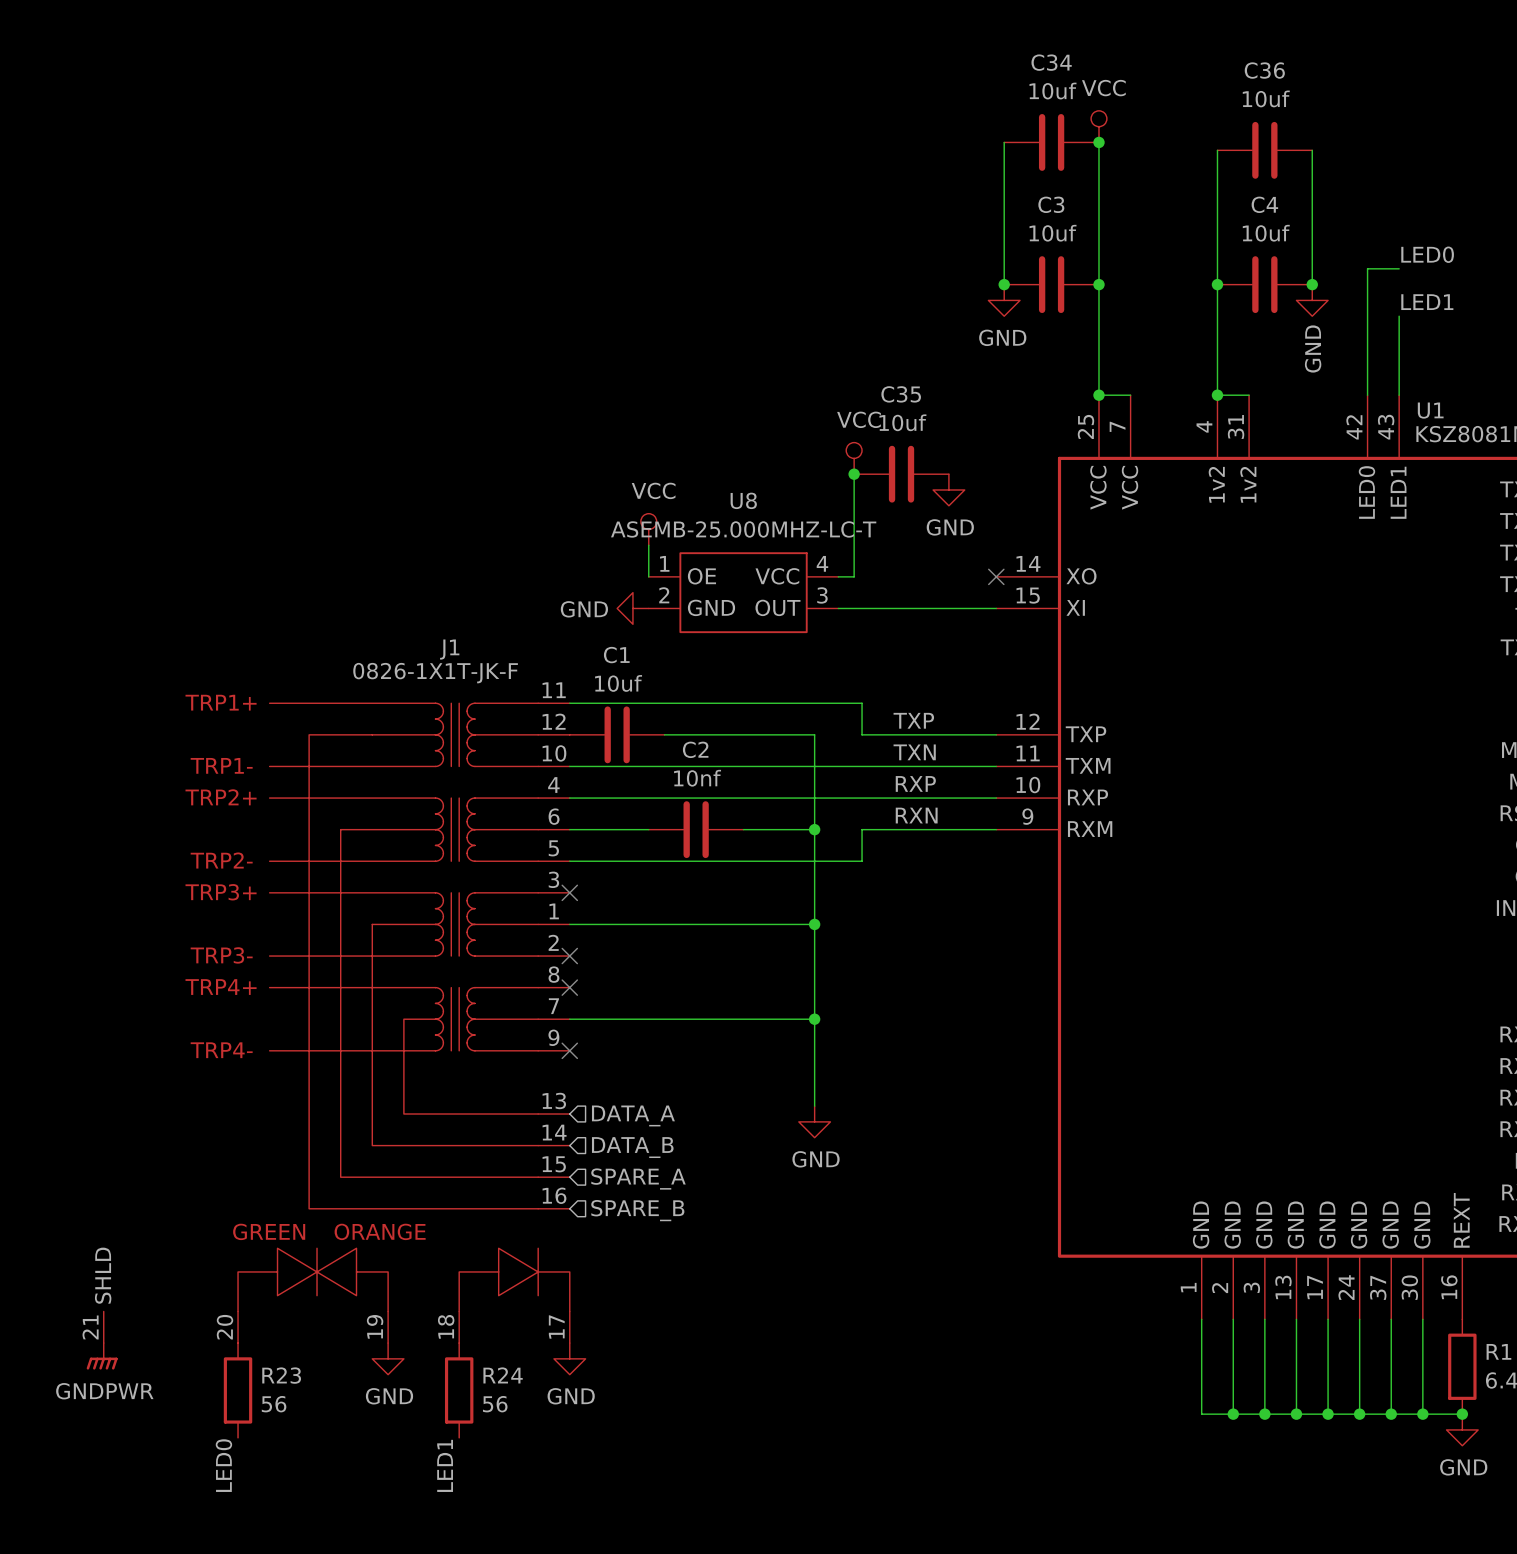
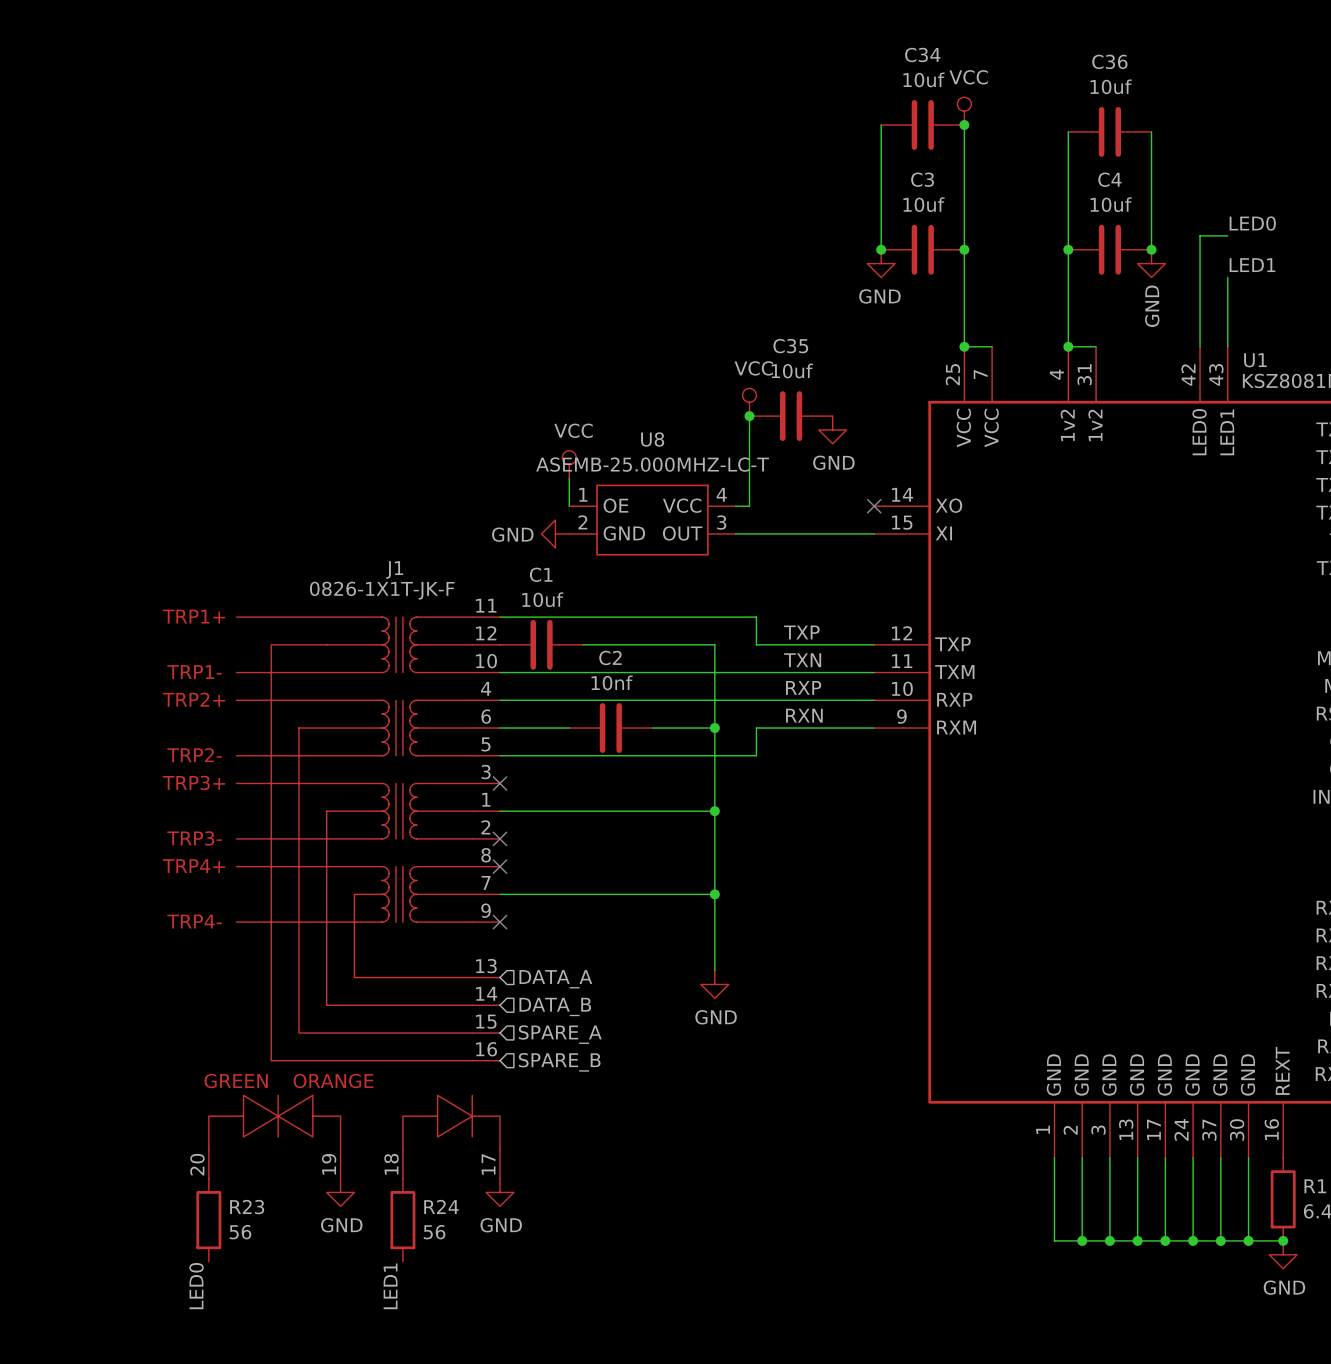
J1 symbol: [103, 703, 570, 1344] -> [208, 617, 500, 1179]
power symbol: GNDPWR (102, 1356) -> none

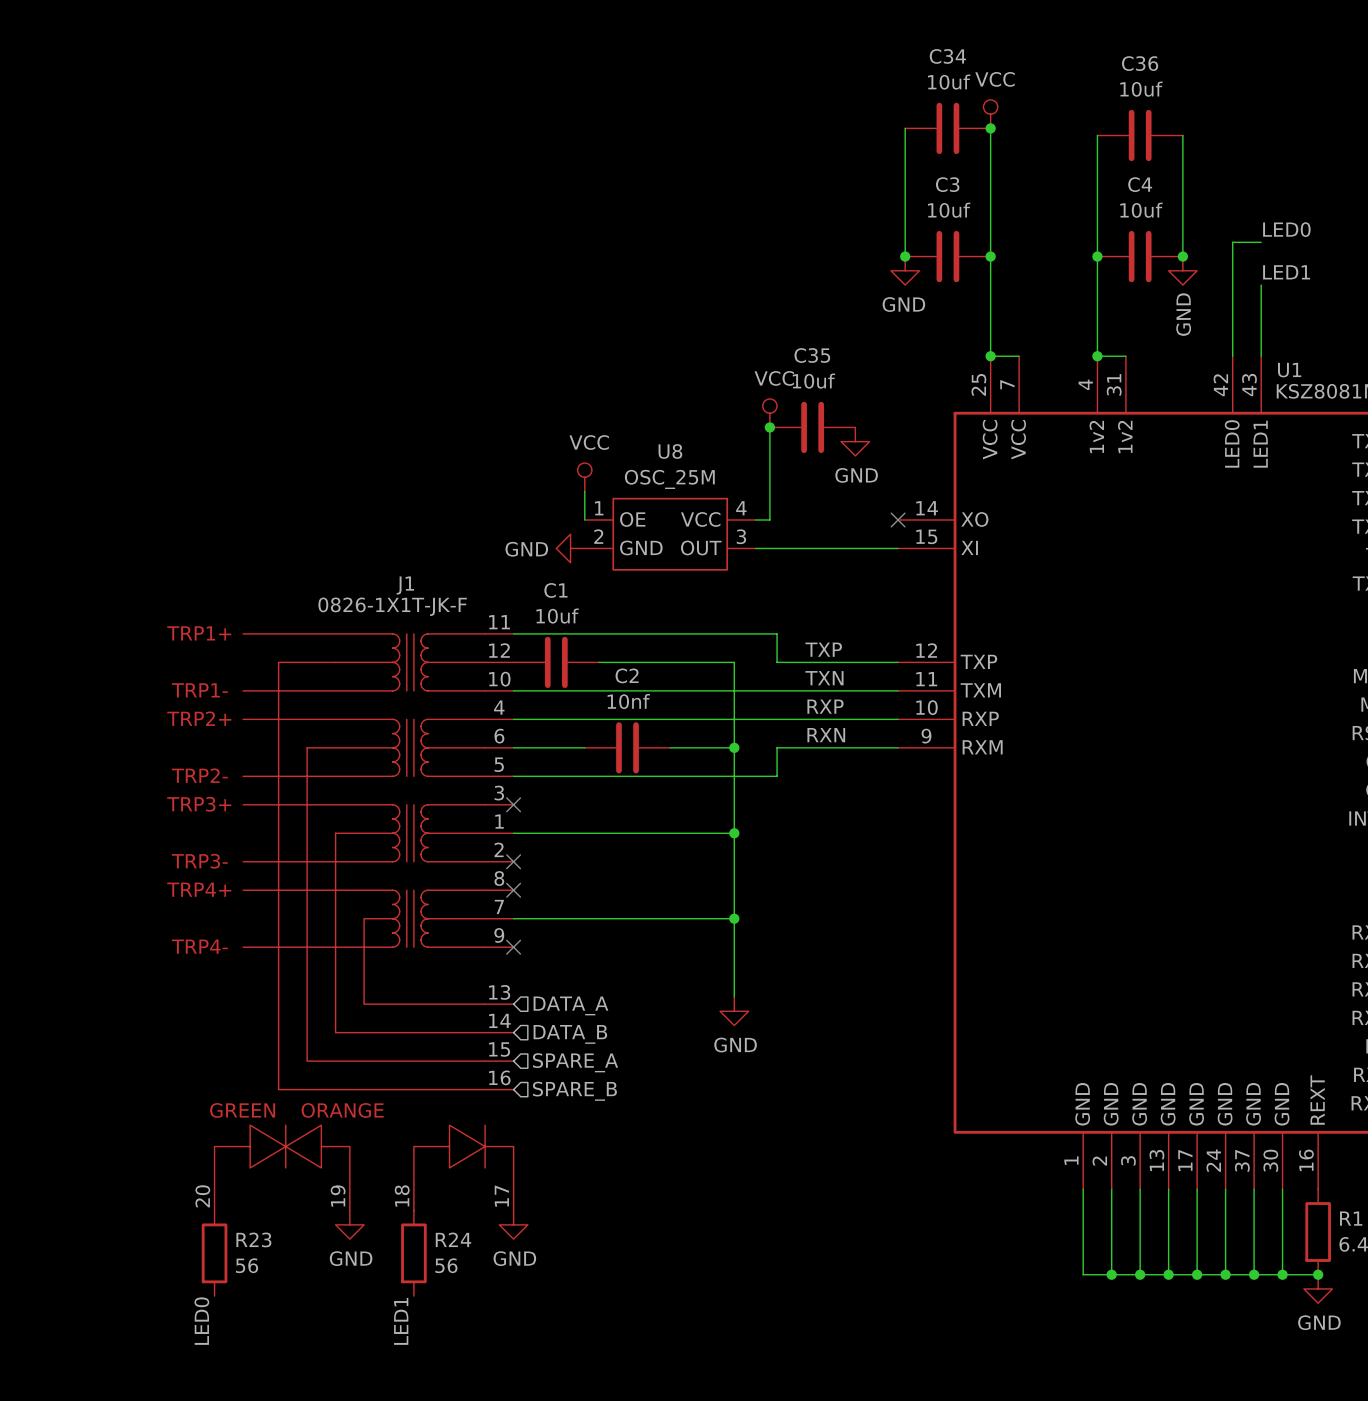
U8 value: ASEMB-25.000MHZ-LC-T (652, 464) -> OSC_25M (669, 479)

